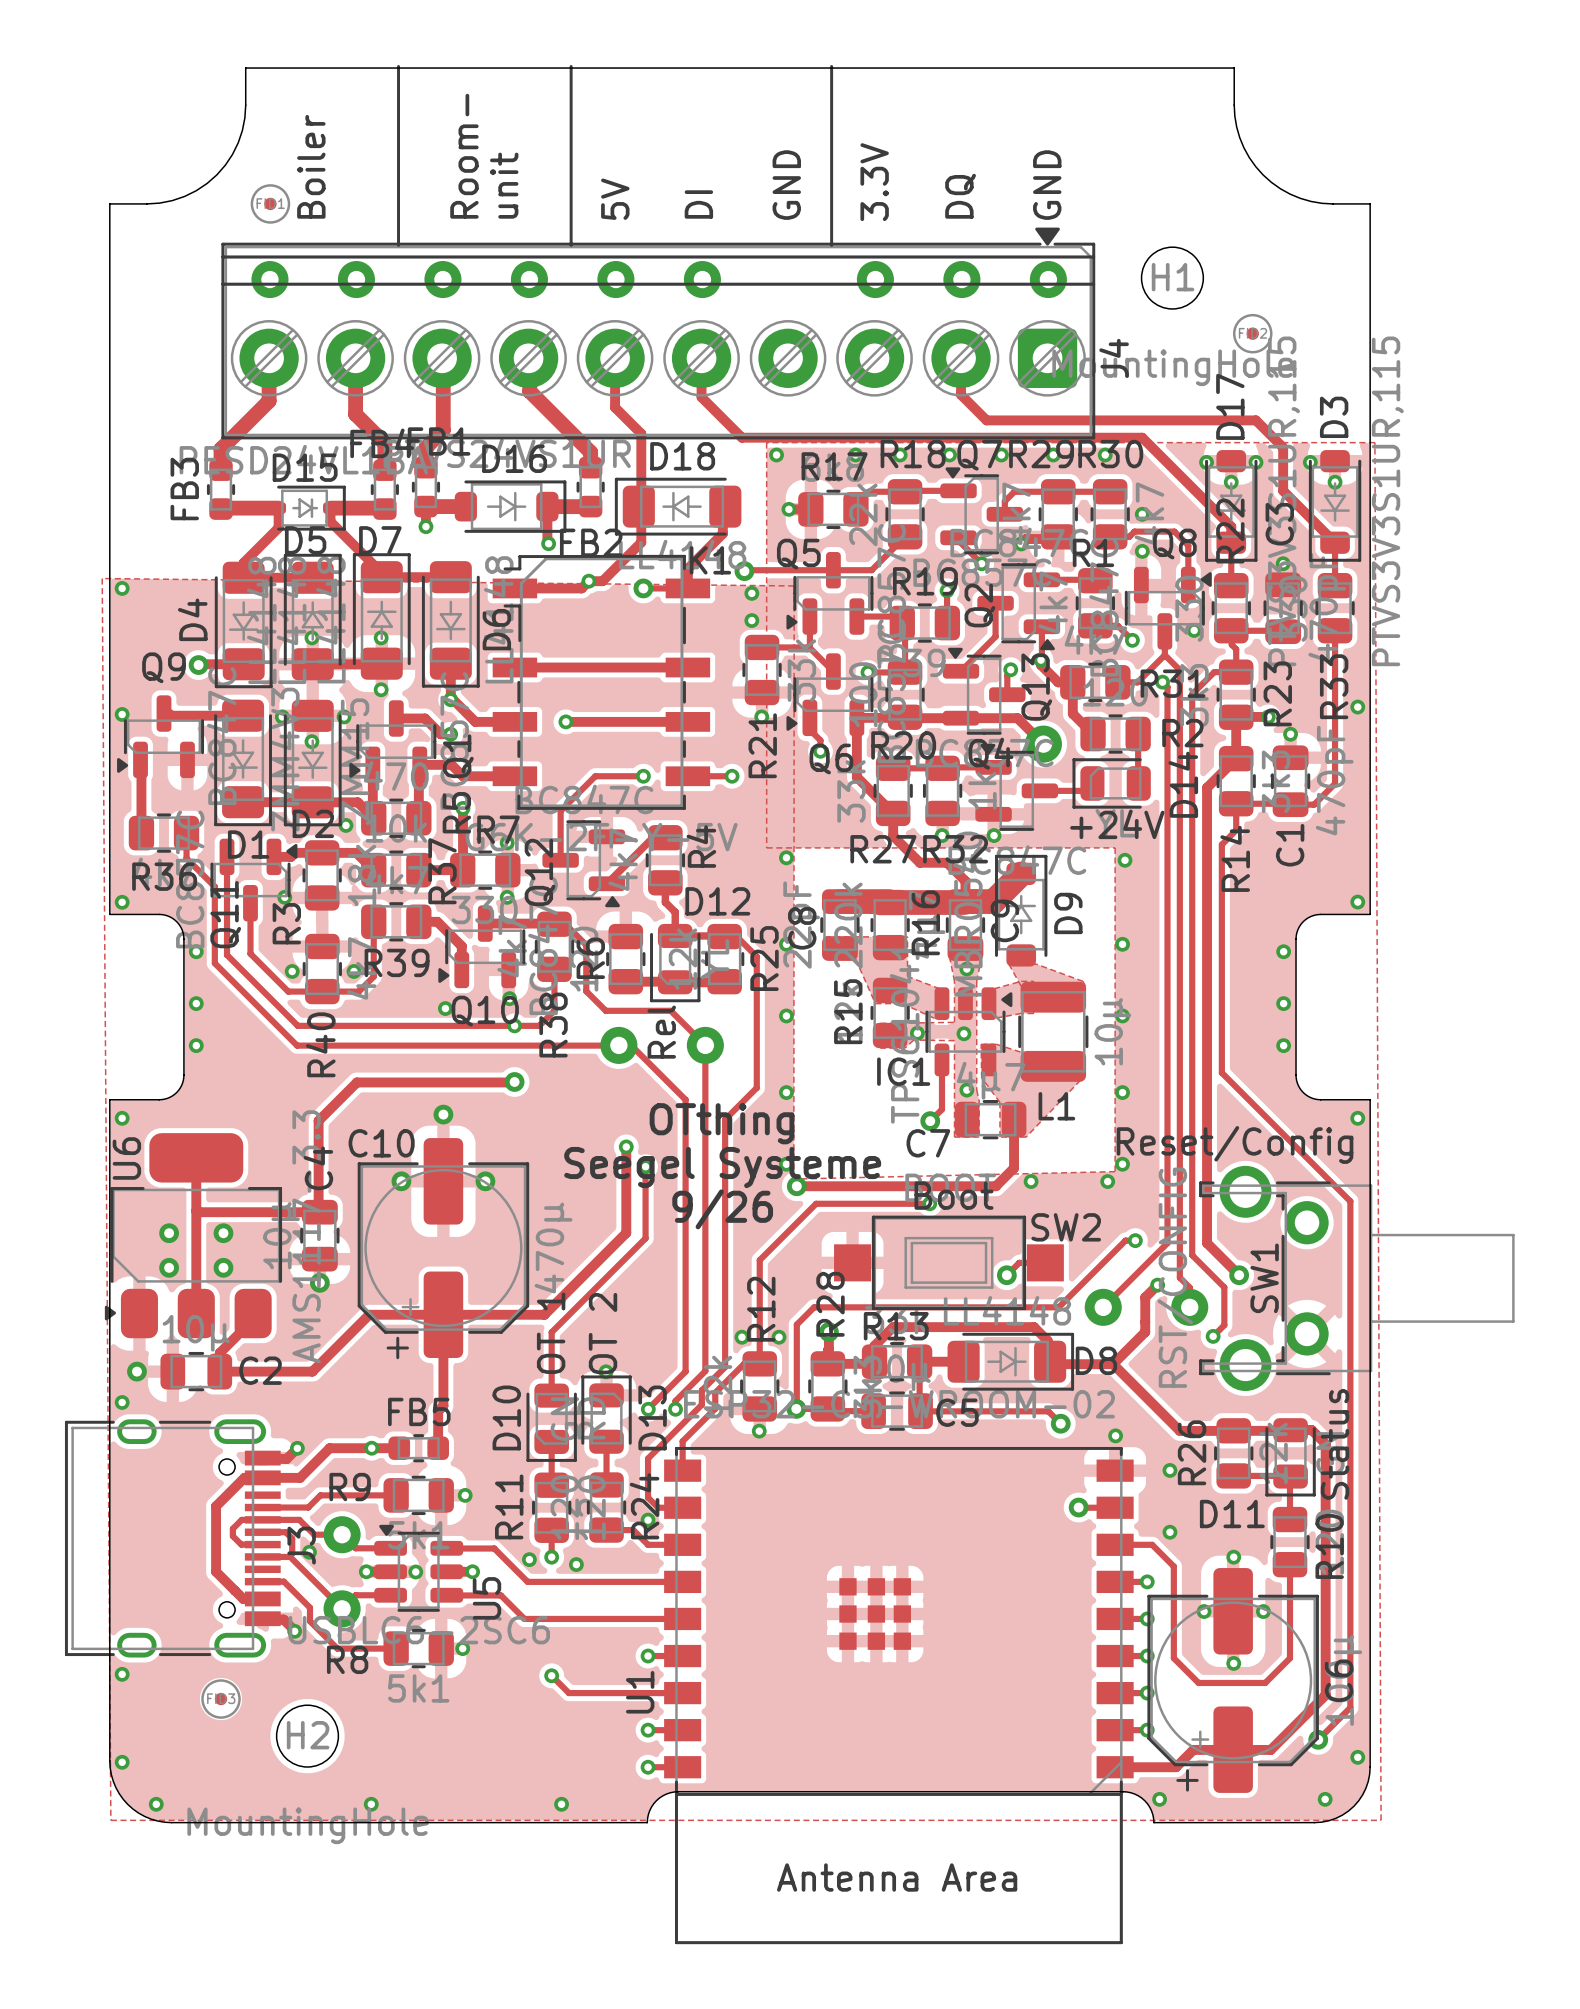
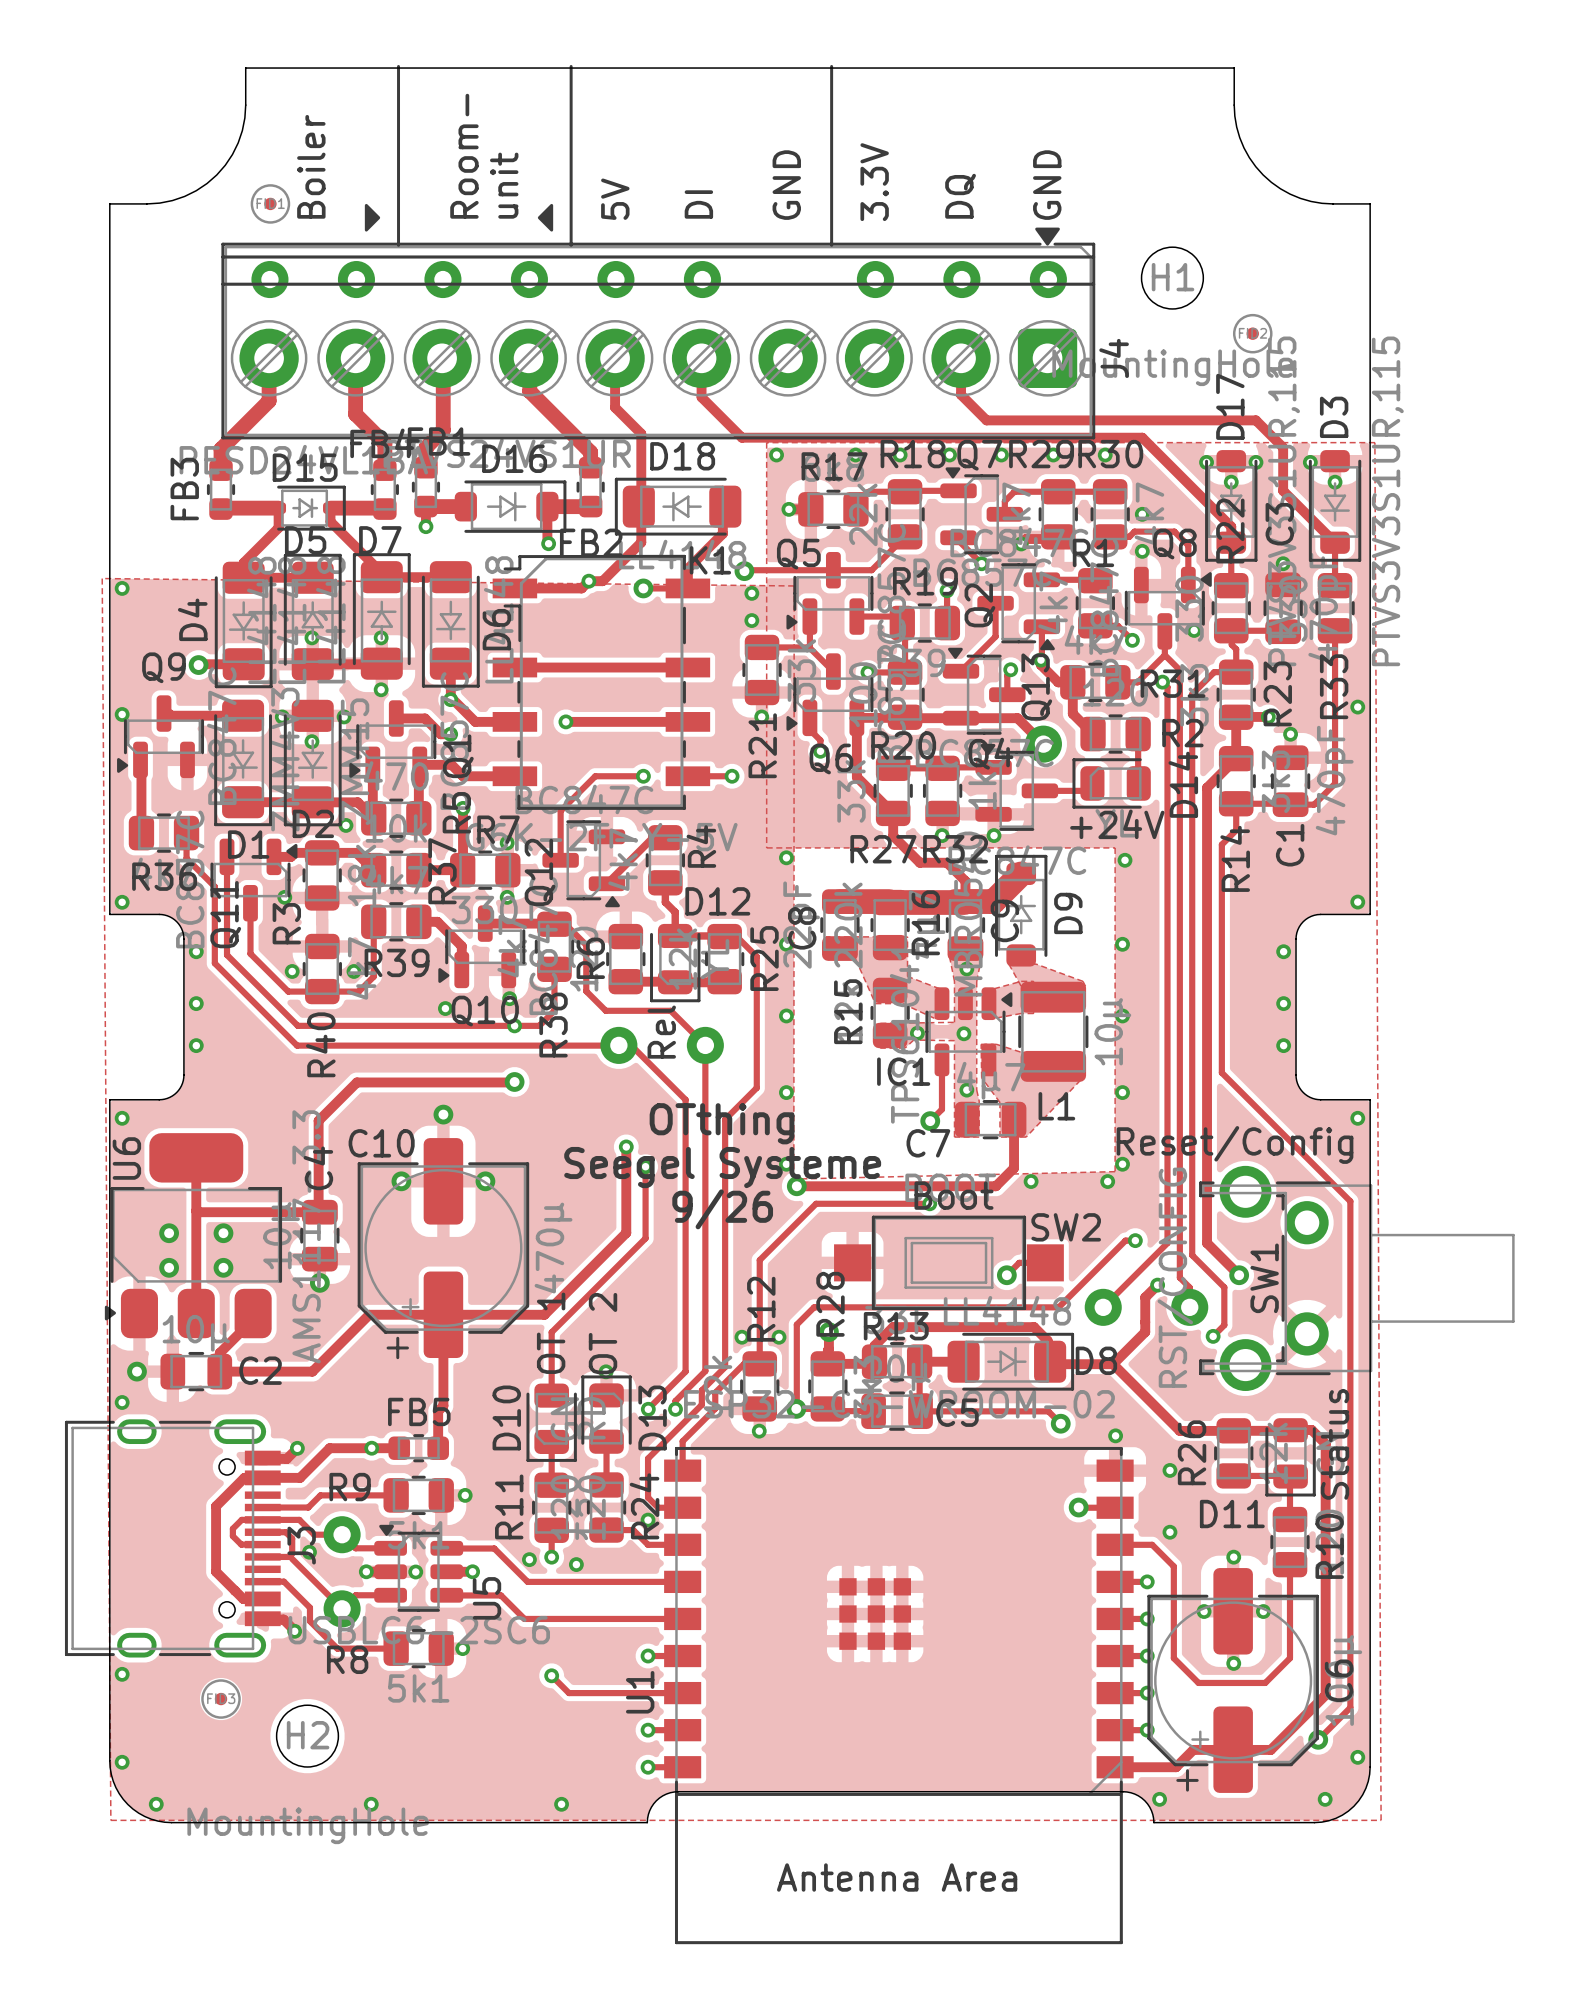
drawing: none -> [364, 203, 381, 232]
drawing: none -> [537, 203, 554, 232]

